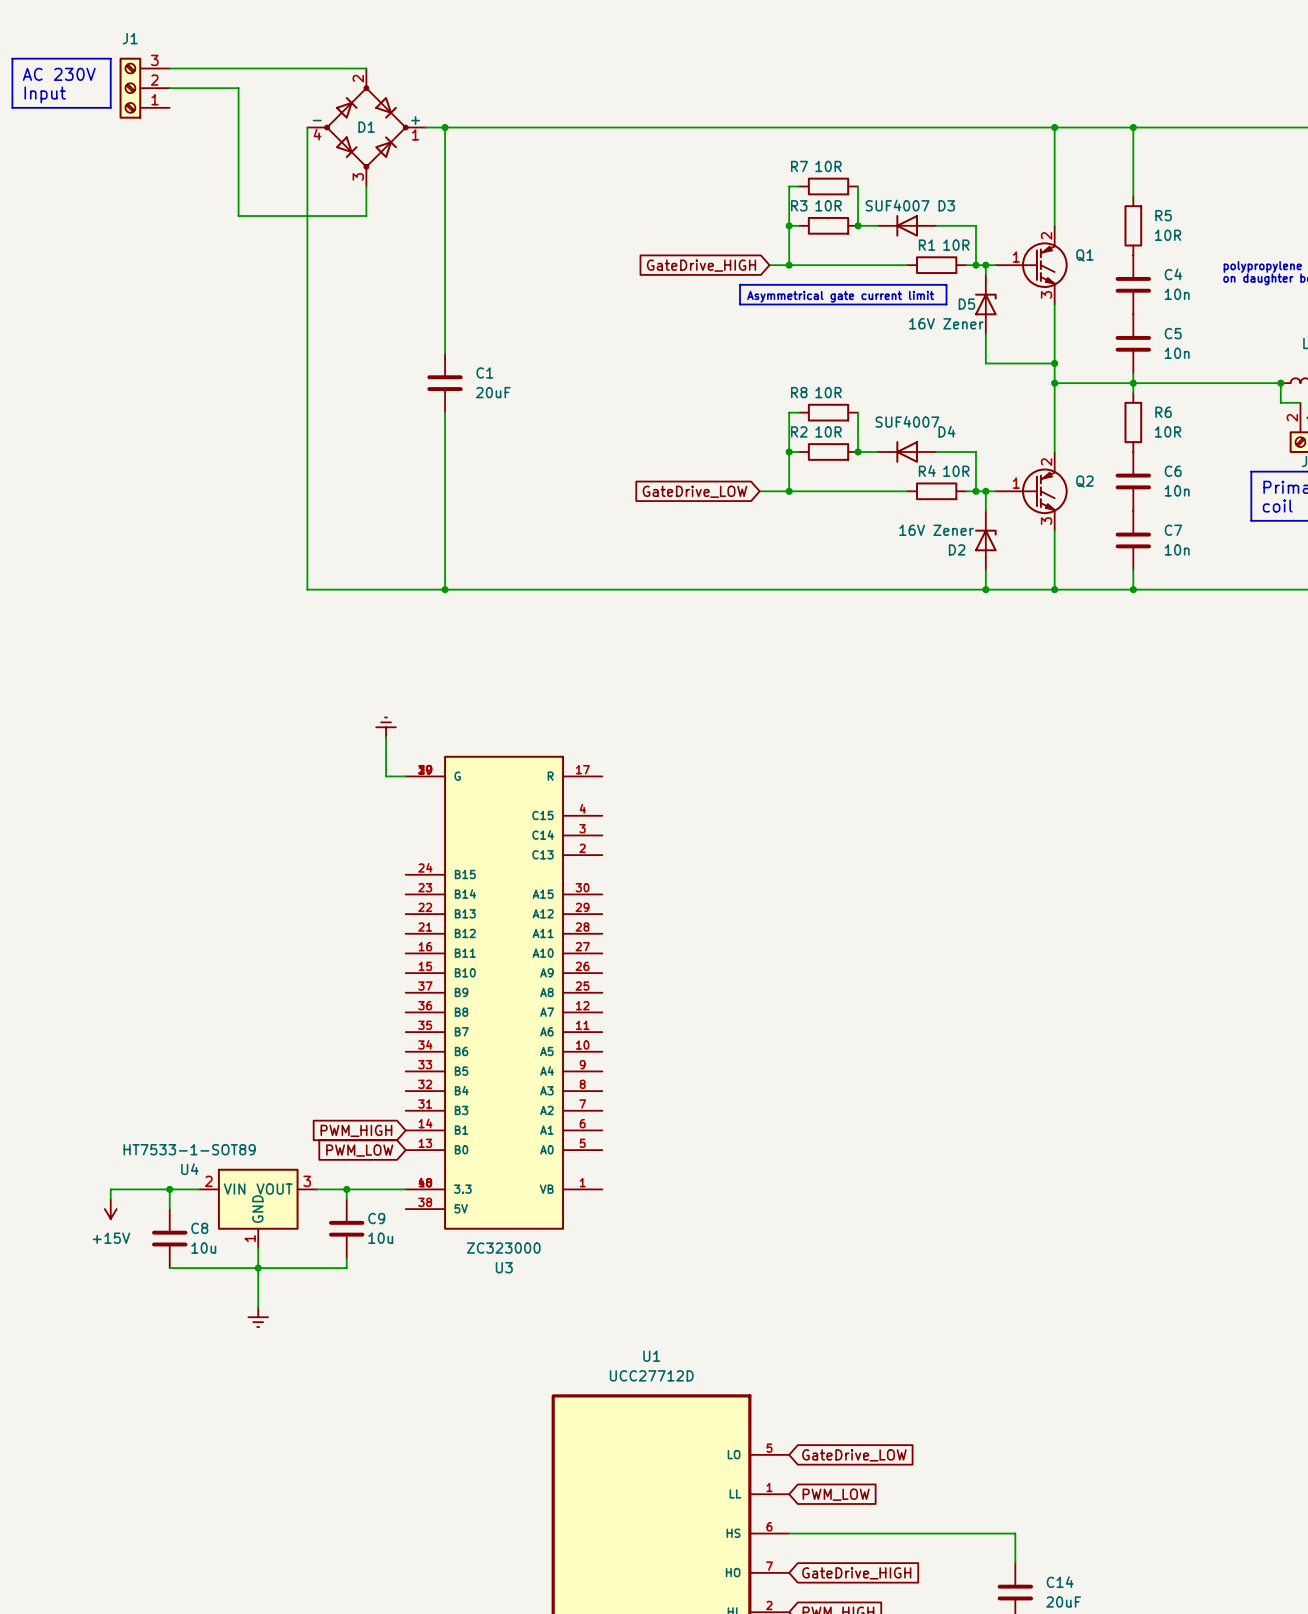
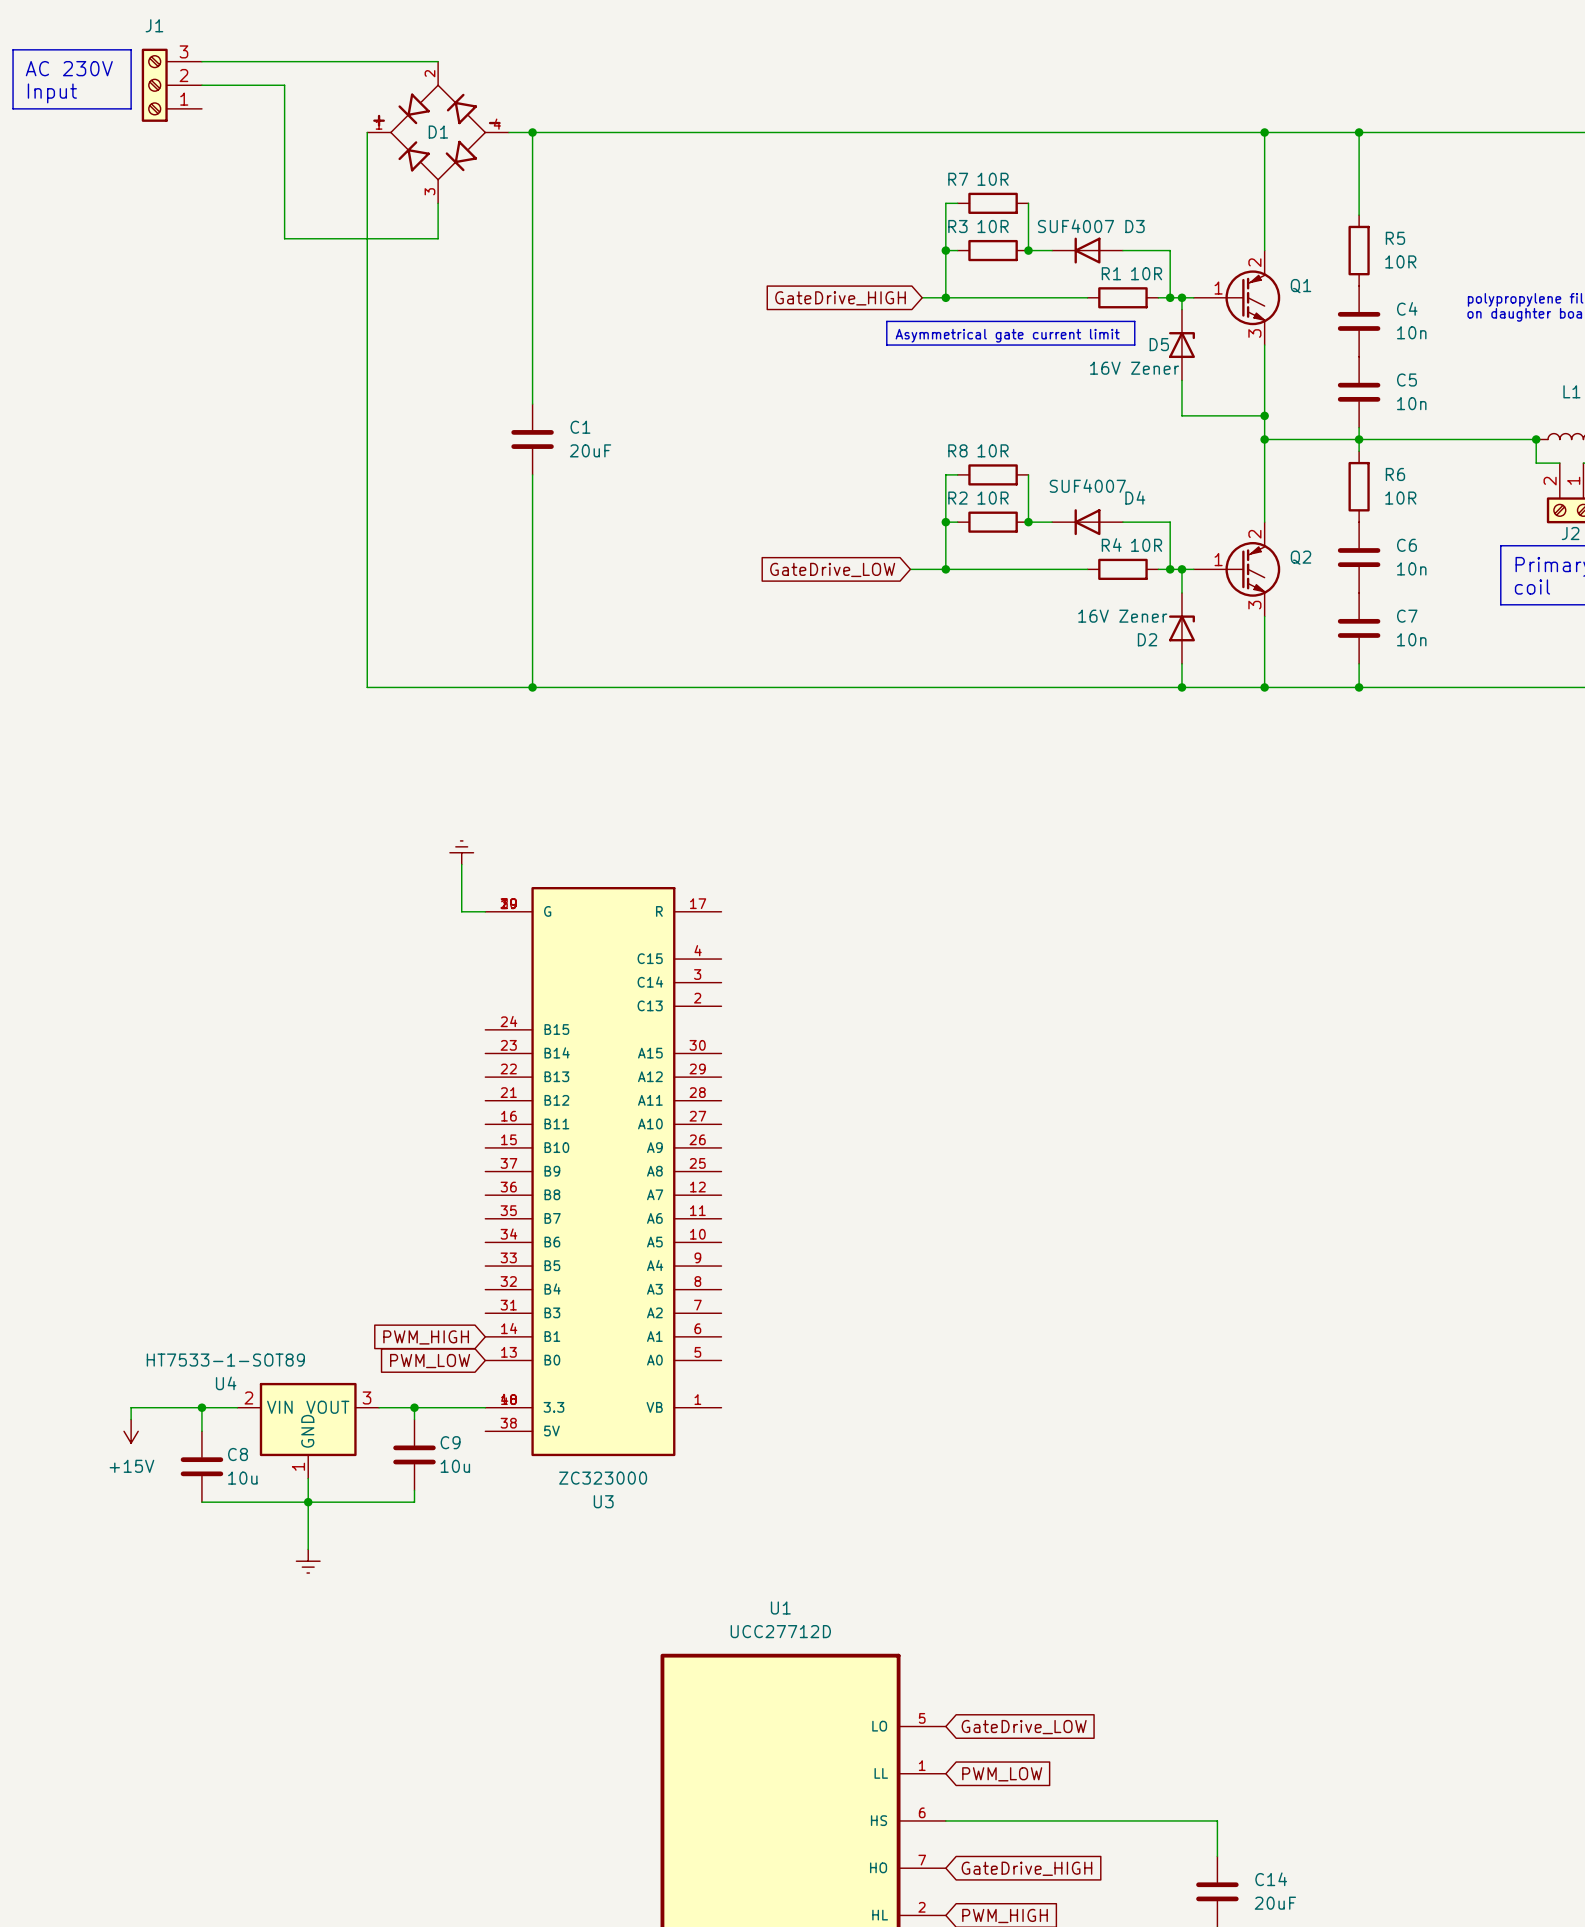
D1 symbol: [307, 68, 426, 187] -> [367, 61, 509, 204]

